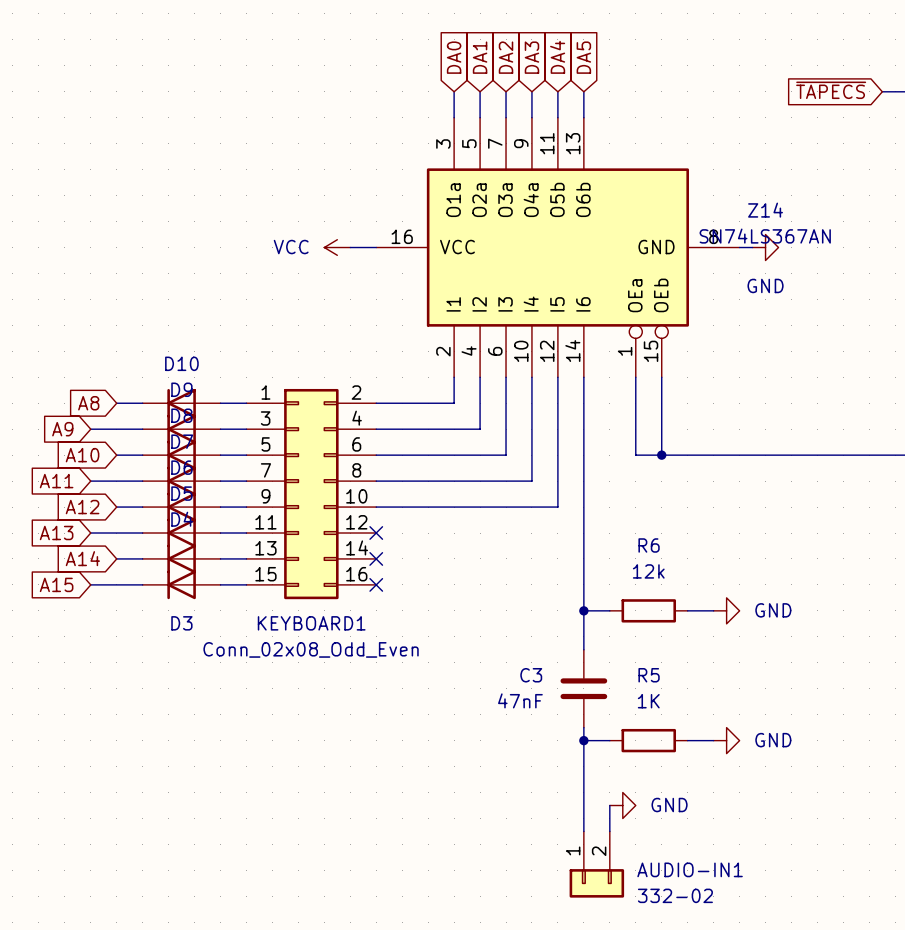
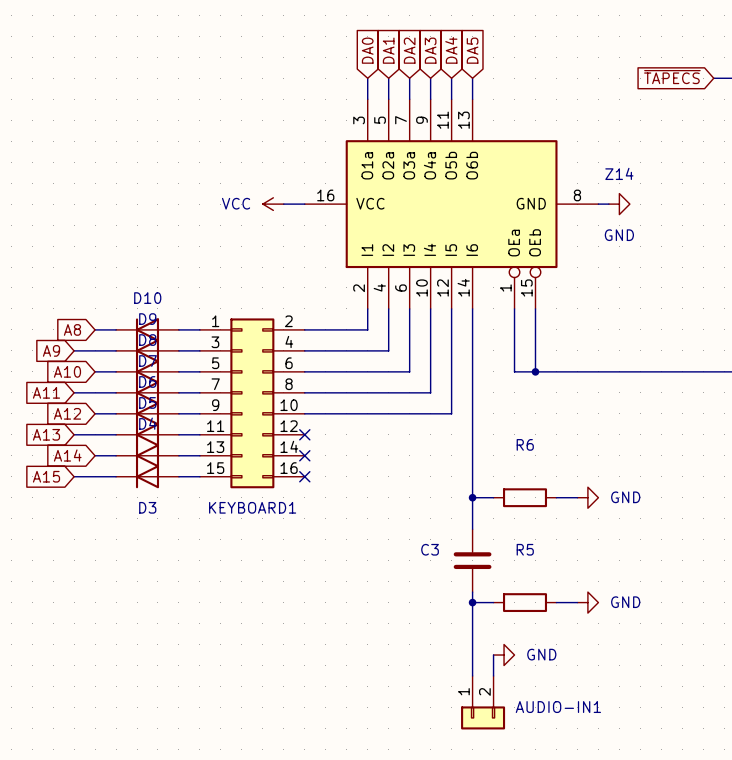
Z14 value: SN74LS367AN (765, 236) -> none
R6 value: 12k (648, 571) -> none
KEYBOARD1 value: Conn_02x08_Odd_Even (311, 649) -> none
C3 value: 47nF (520, 700) -> none
R5 value: 1K (648, 701) -> none
AUDIO-IN1 value: 332-02 (675, 895) -> none

